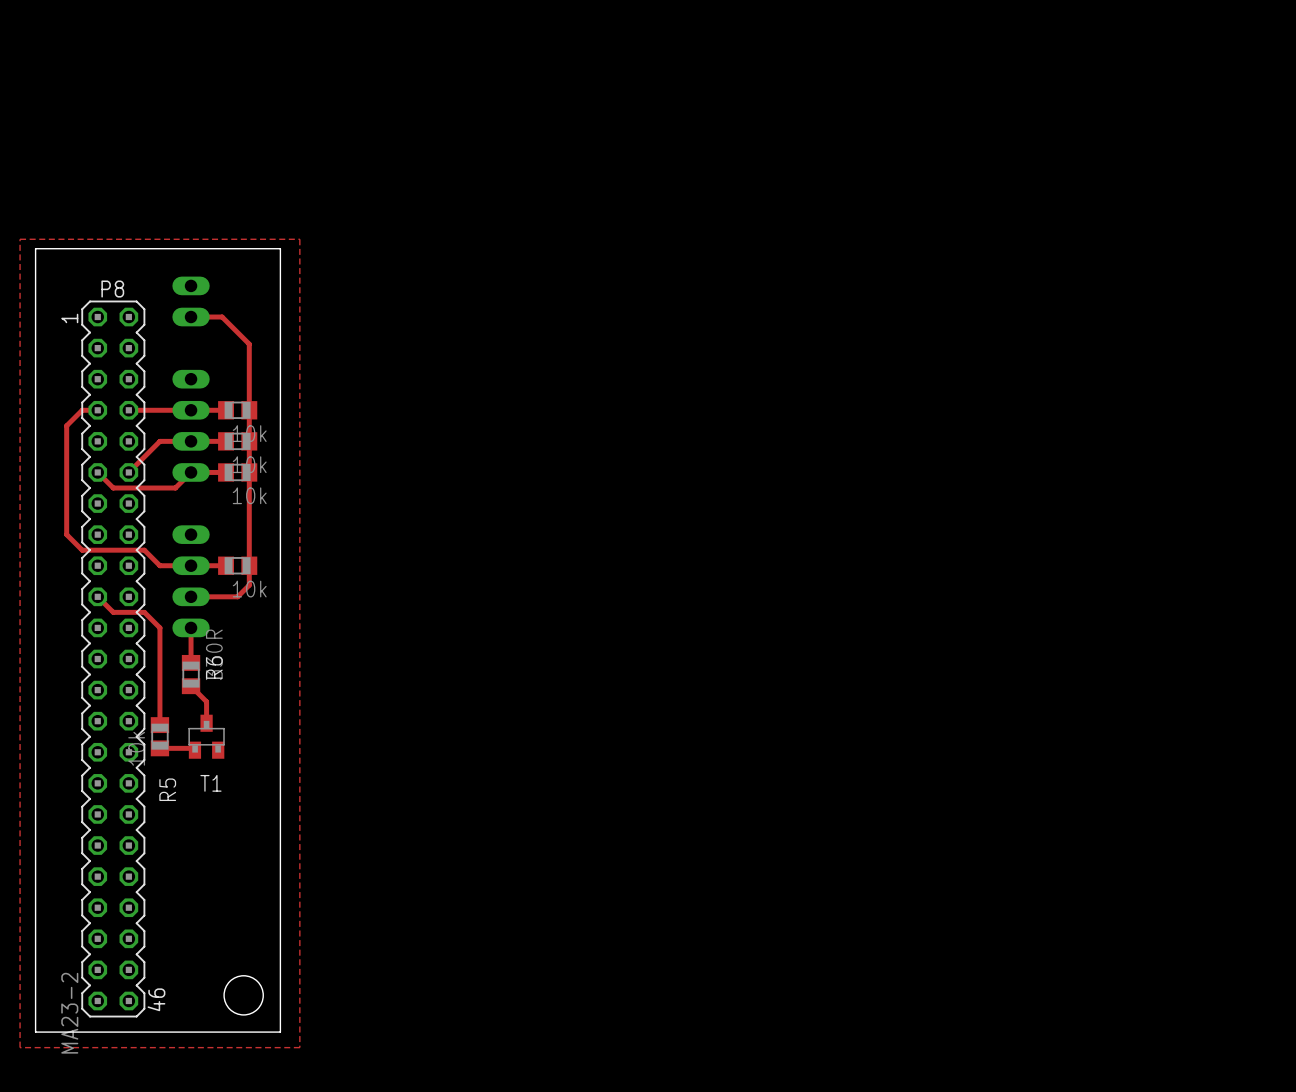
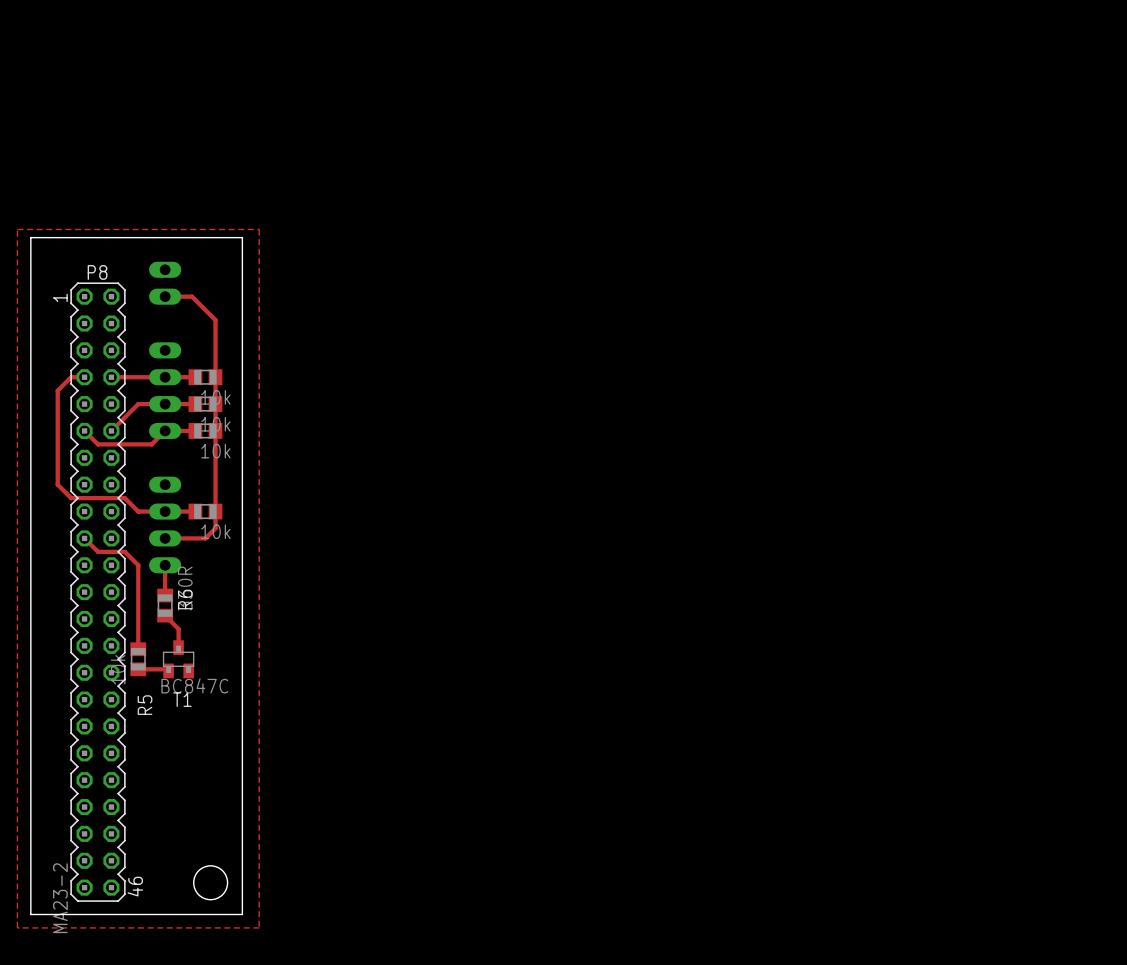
T1 value: none -> BC847C (194, 685)

